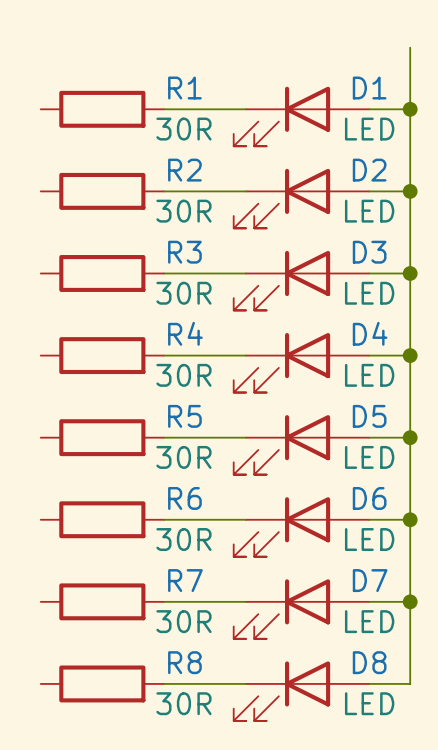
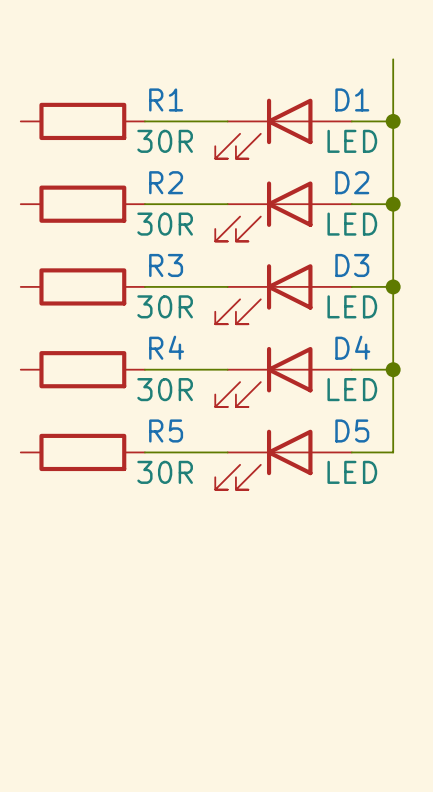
wire: (410, 437) (410, 683) (369, 683) -> none
junction: (410, 437) -> none
R6: 30R (102, 519) -> none
wire: (163, 519) (246, 519) -> none
wire: (369, 519) (410, 519) -> none
junction: (410, 519) -> none
D6: LED (301, 526) -> none
R7: 30R (102, 601) -> none
wire: (163, 601) (246, 601) -> none
wire: (369, 601) (410, 601) -> none
junction: (410, 601) -> none
D7: LED (301, 609) -> none
R8: 30R (102, 683) -> none
wire: (163, 683) (246, 683) -> none
D8: LED (301, 691) -> none

